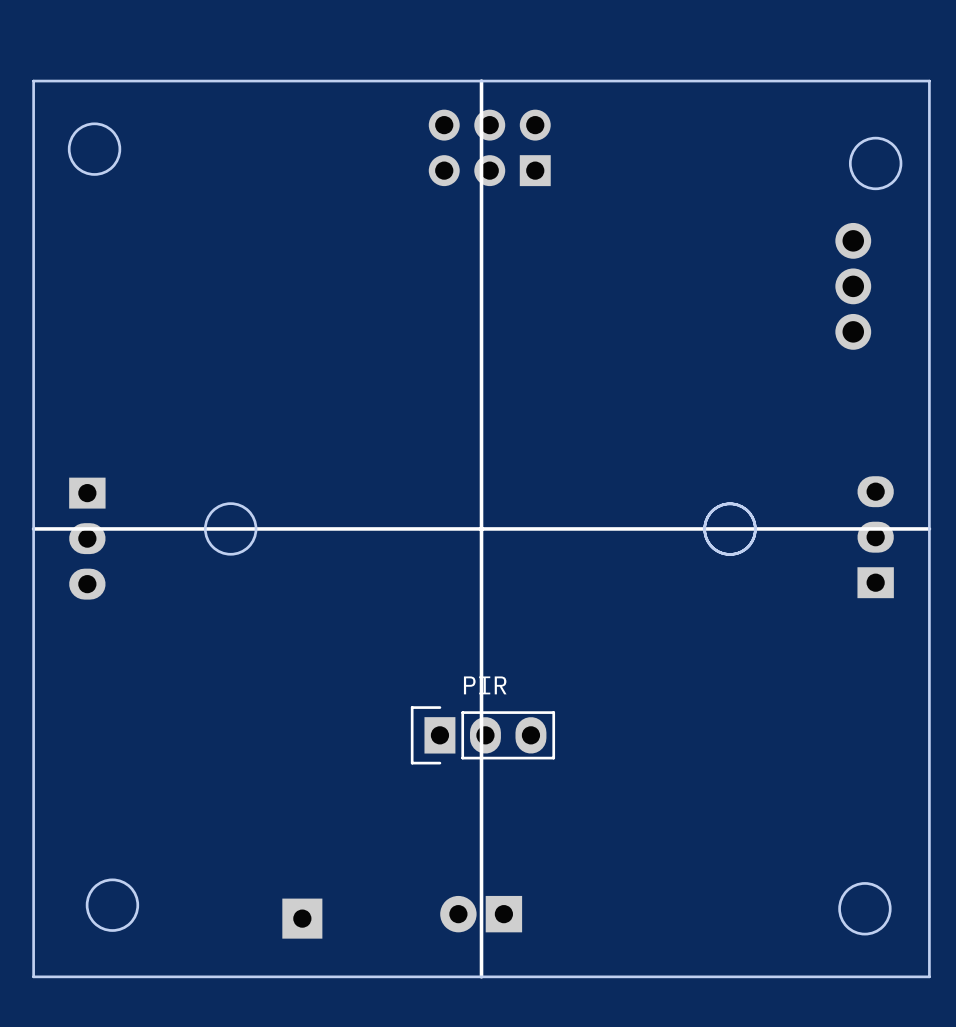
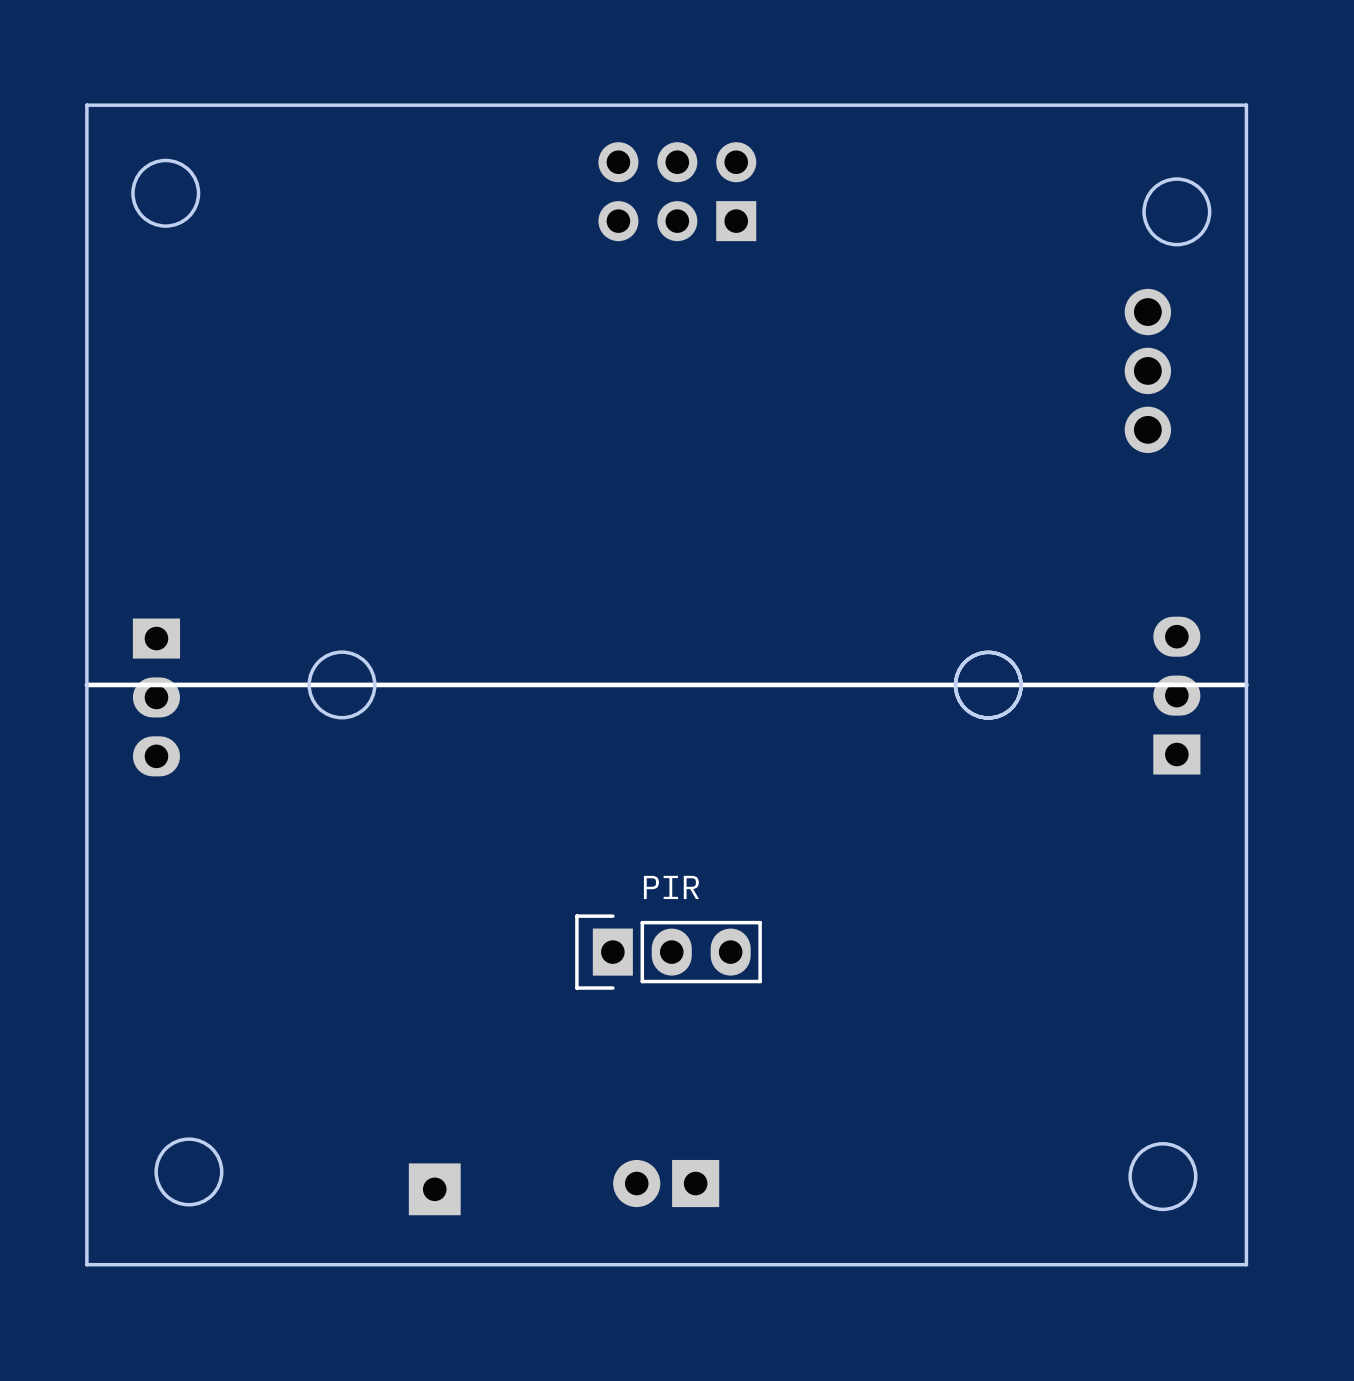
line: (481, 81) (481, 976) -> none

